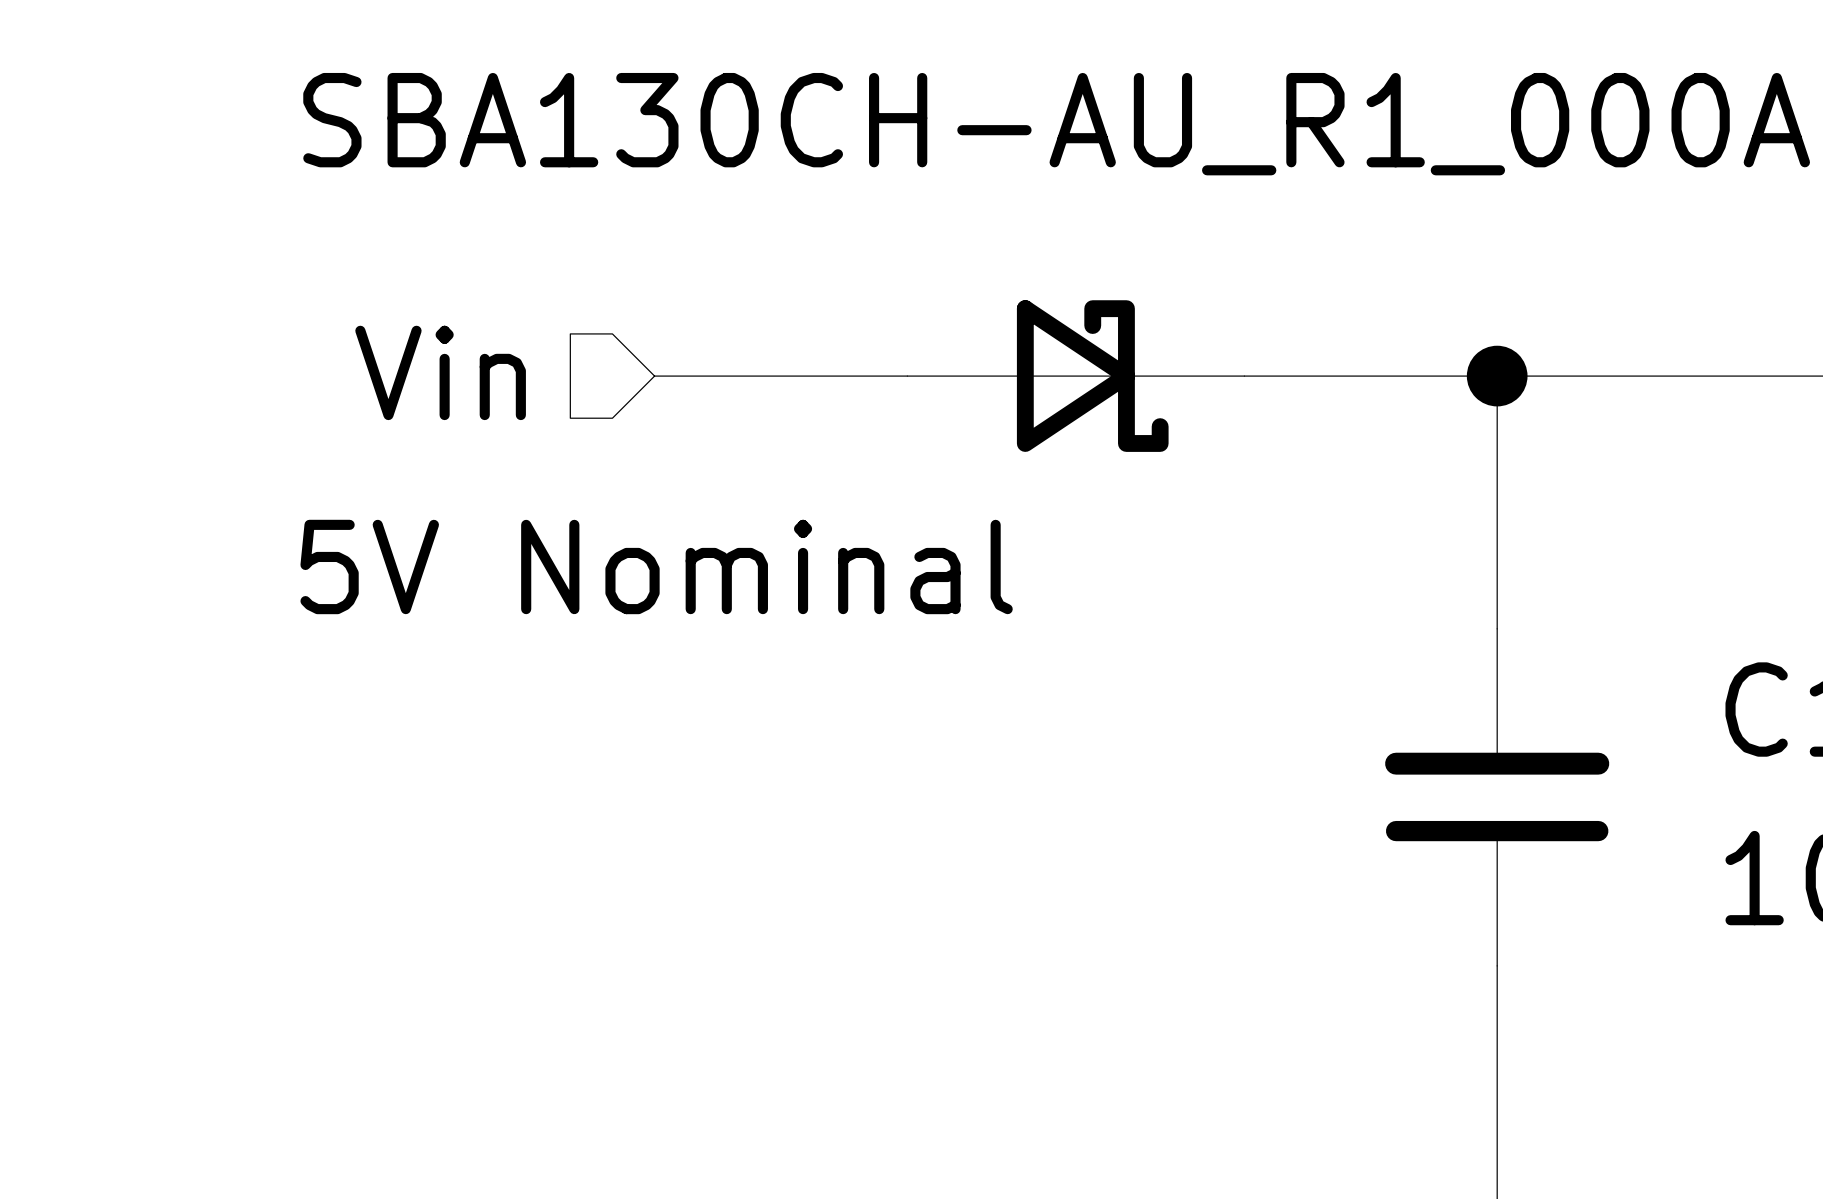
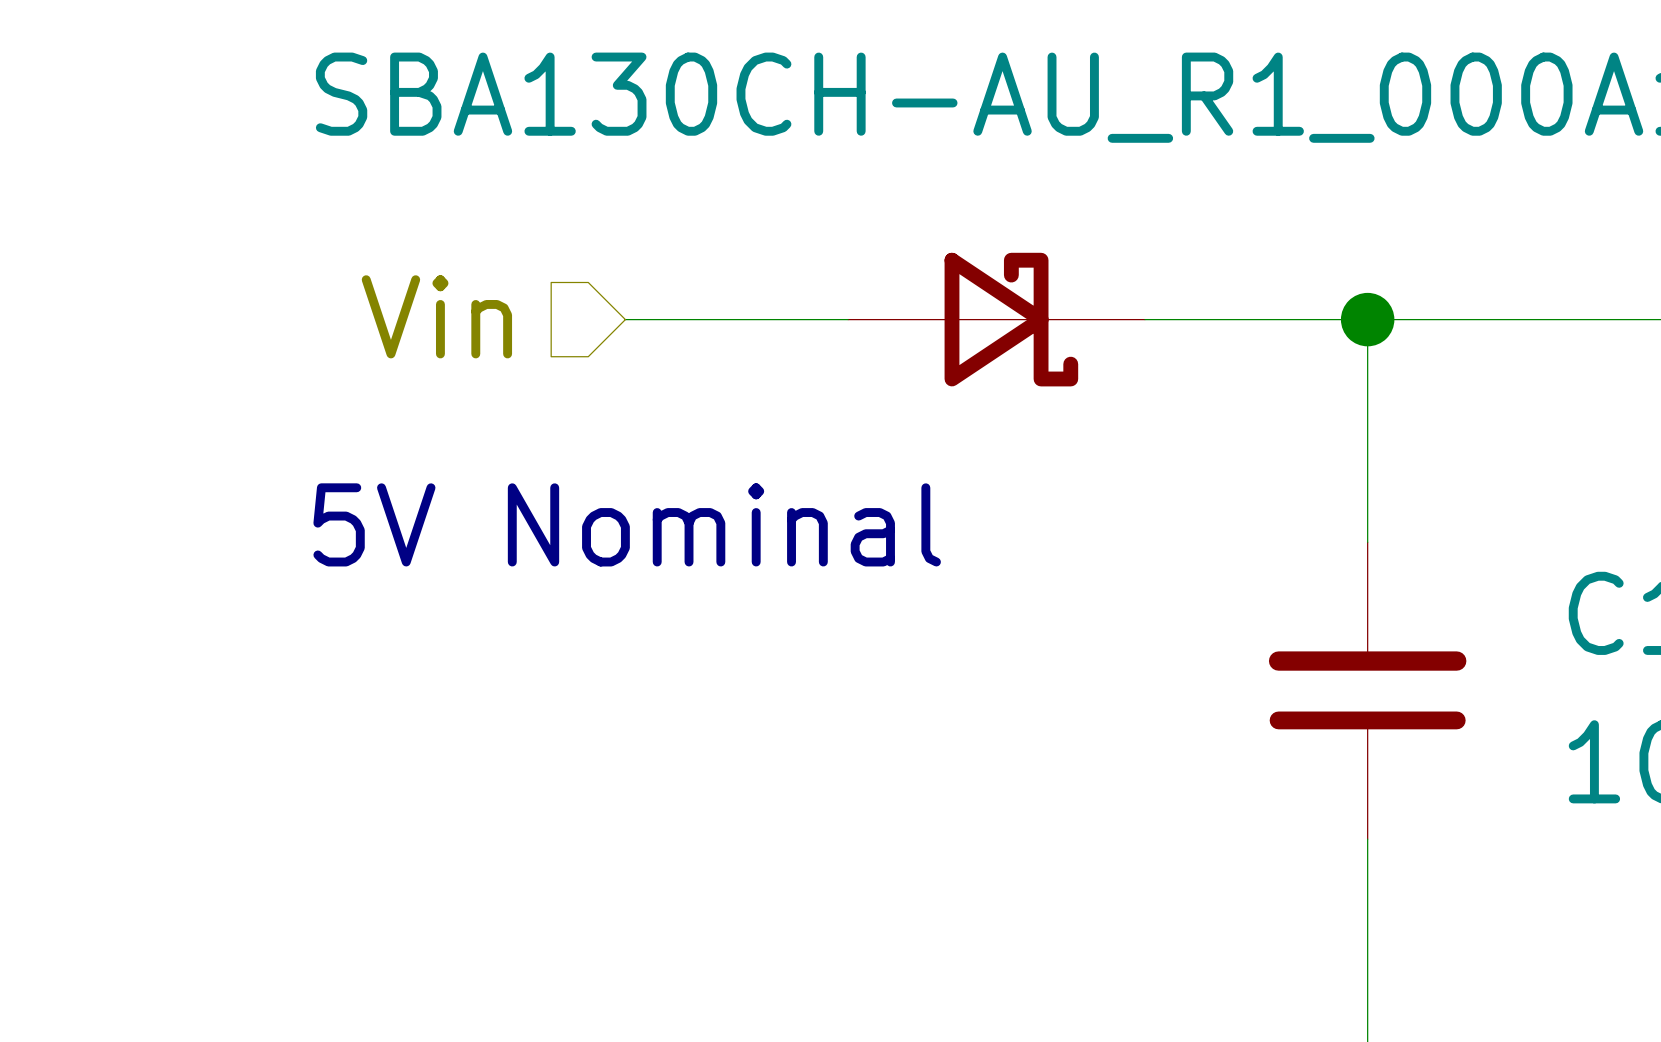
text position: 5V Nominal (656, 566) -> 5V Nominal (627, 524)

